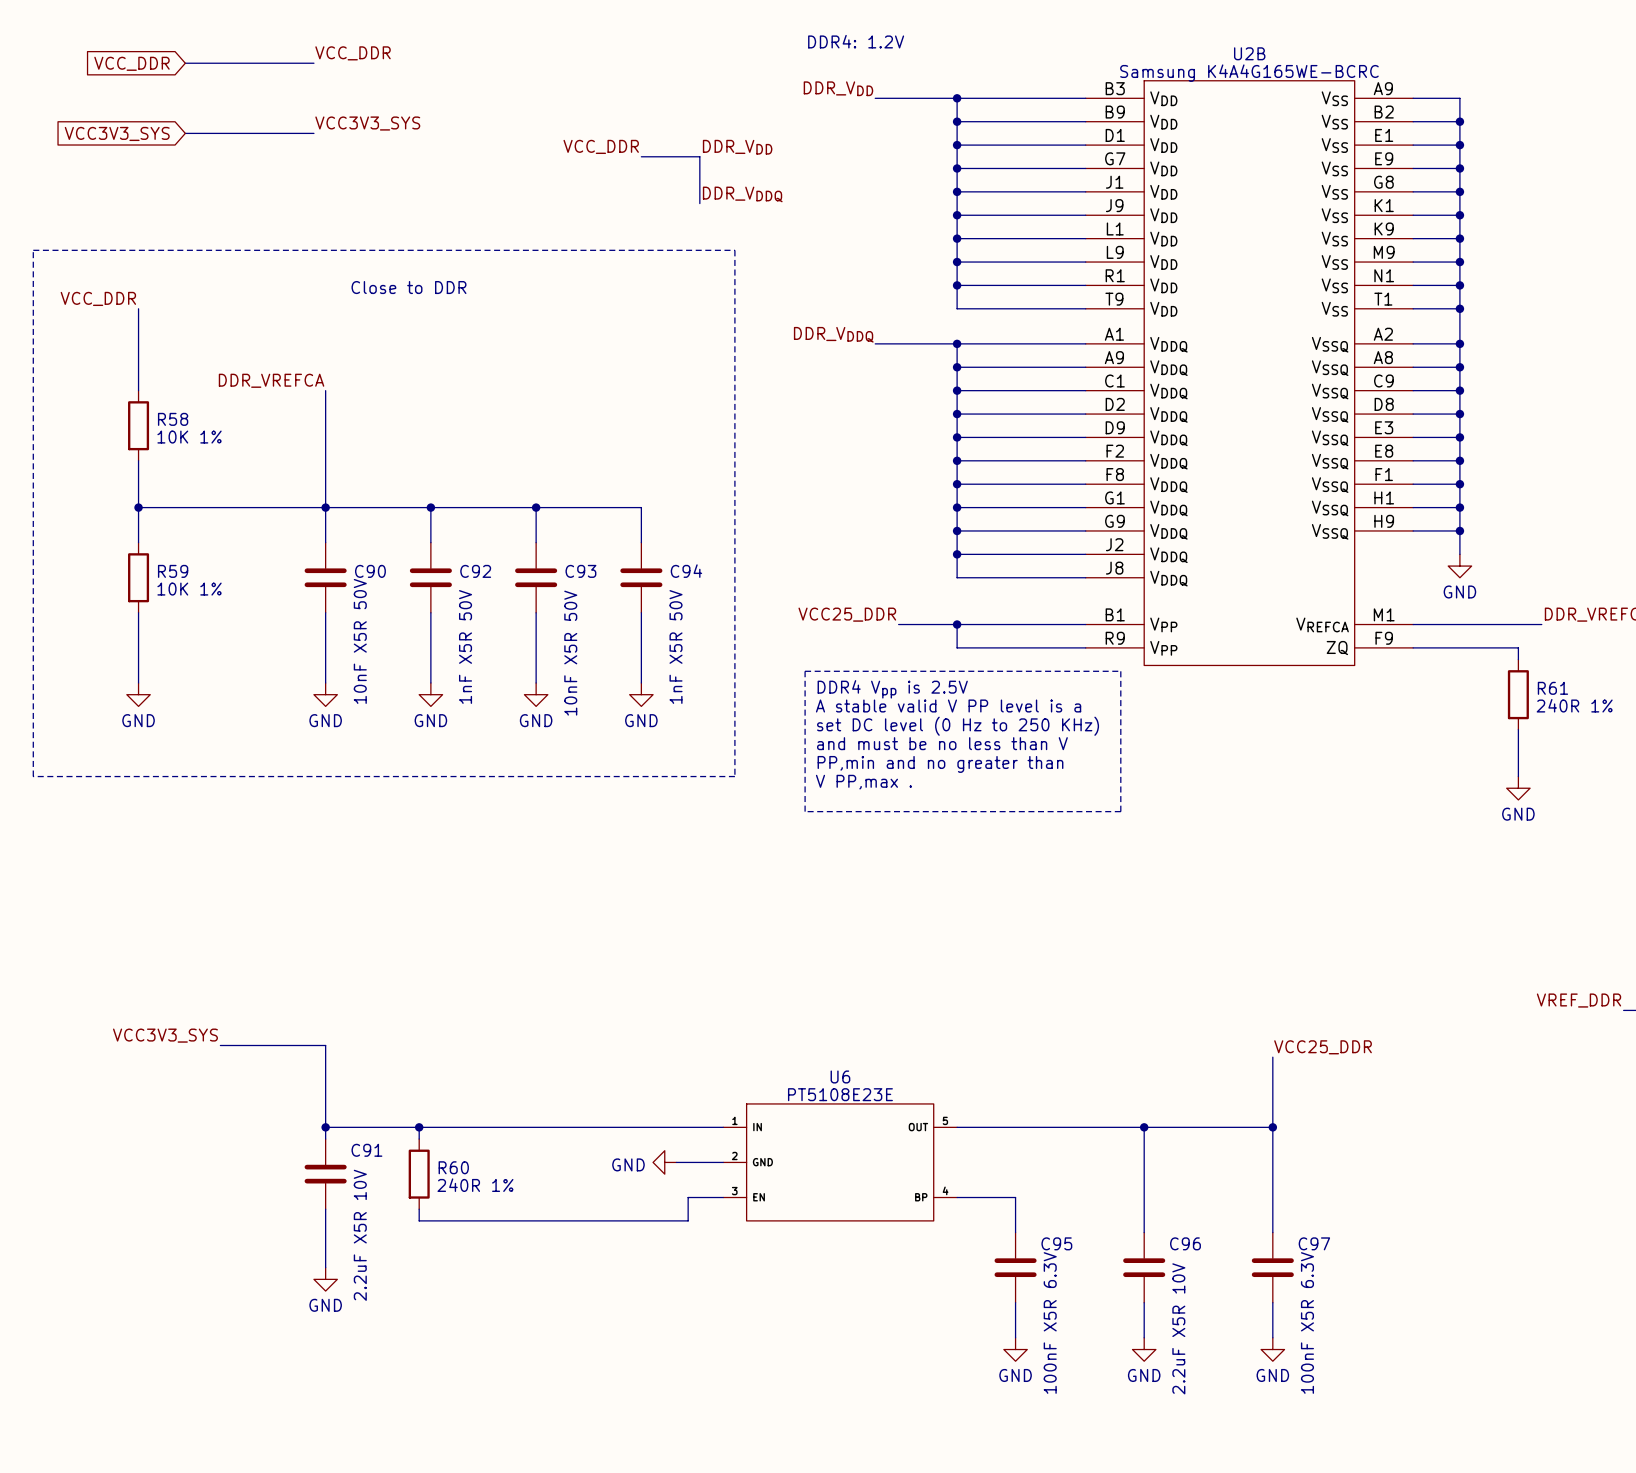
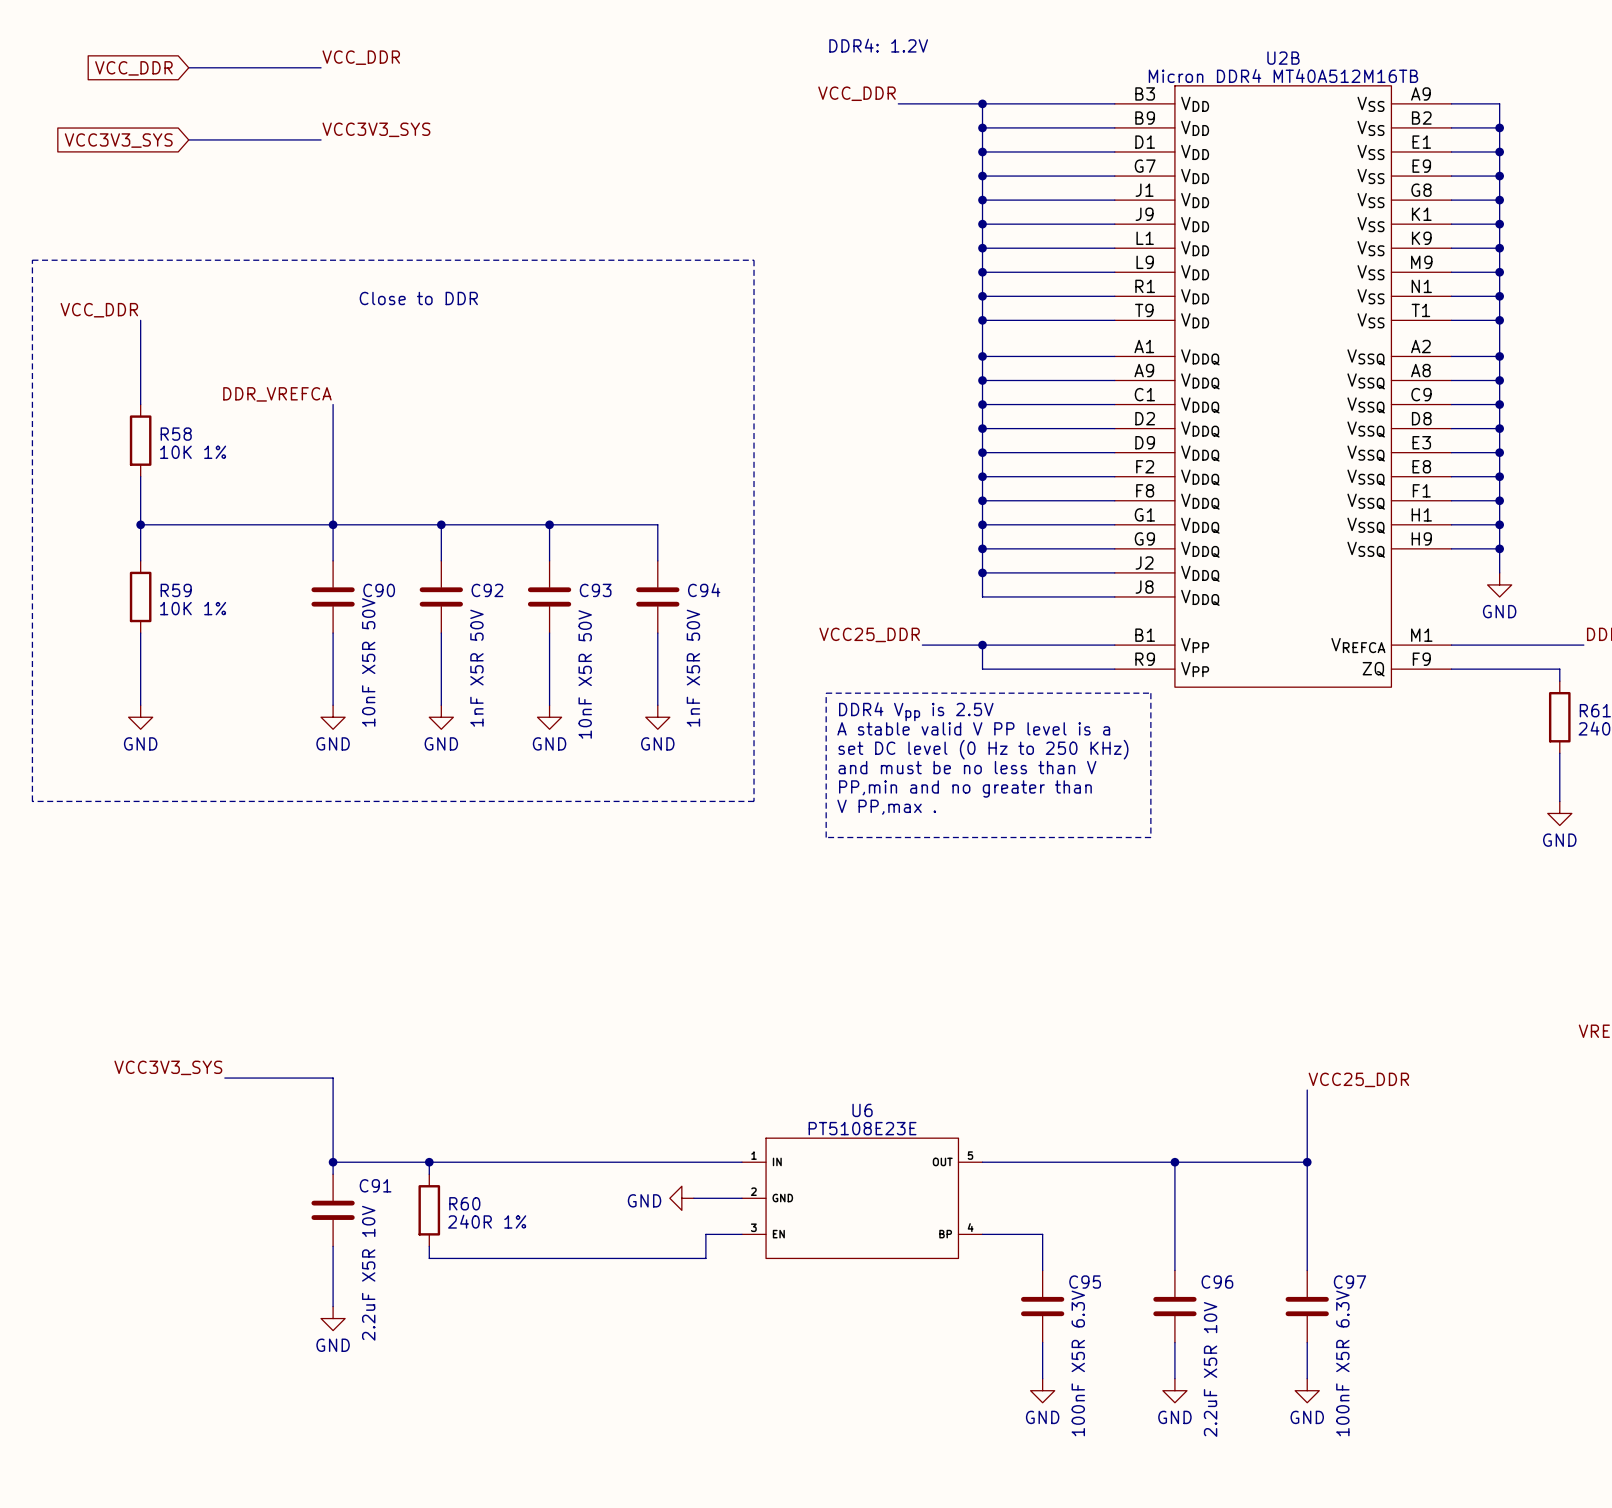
U2B value: Samsung K4A4G165WE-BCRC (1249, 73) -> Micron DDR4 MT40A512M16TB (1283, 76)
label: DDR_VDD (838, 88) -> VCC_DDR (857, 93)
label: VCC_DDR (601, 146) -> none
label: DDR_VDD (737, 147) -> none
wire: (641, 156) (699, 156) (699, 203) -> none
label: DDR_VDDQ (742, 194) -> none
junction: none -> (982, 320)
label: DDR_VDDQ (833, 334) -> none
wire: (875, 343) (957, 343) -> (982, 320) (982, 356)

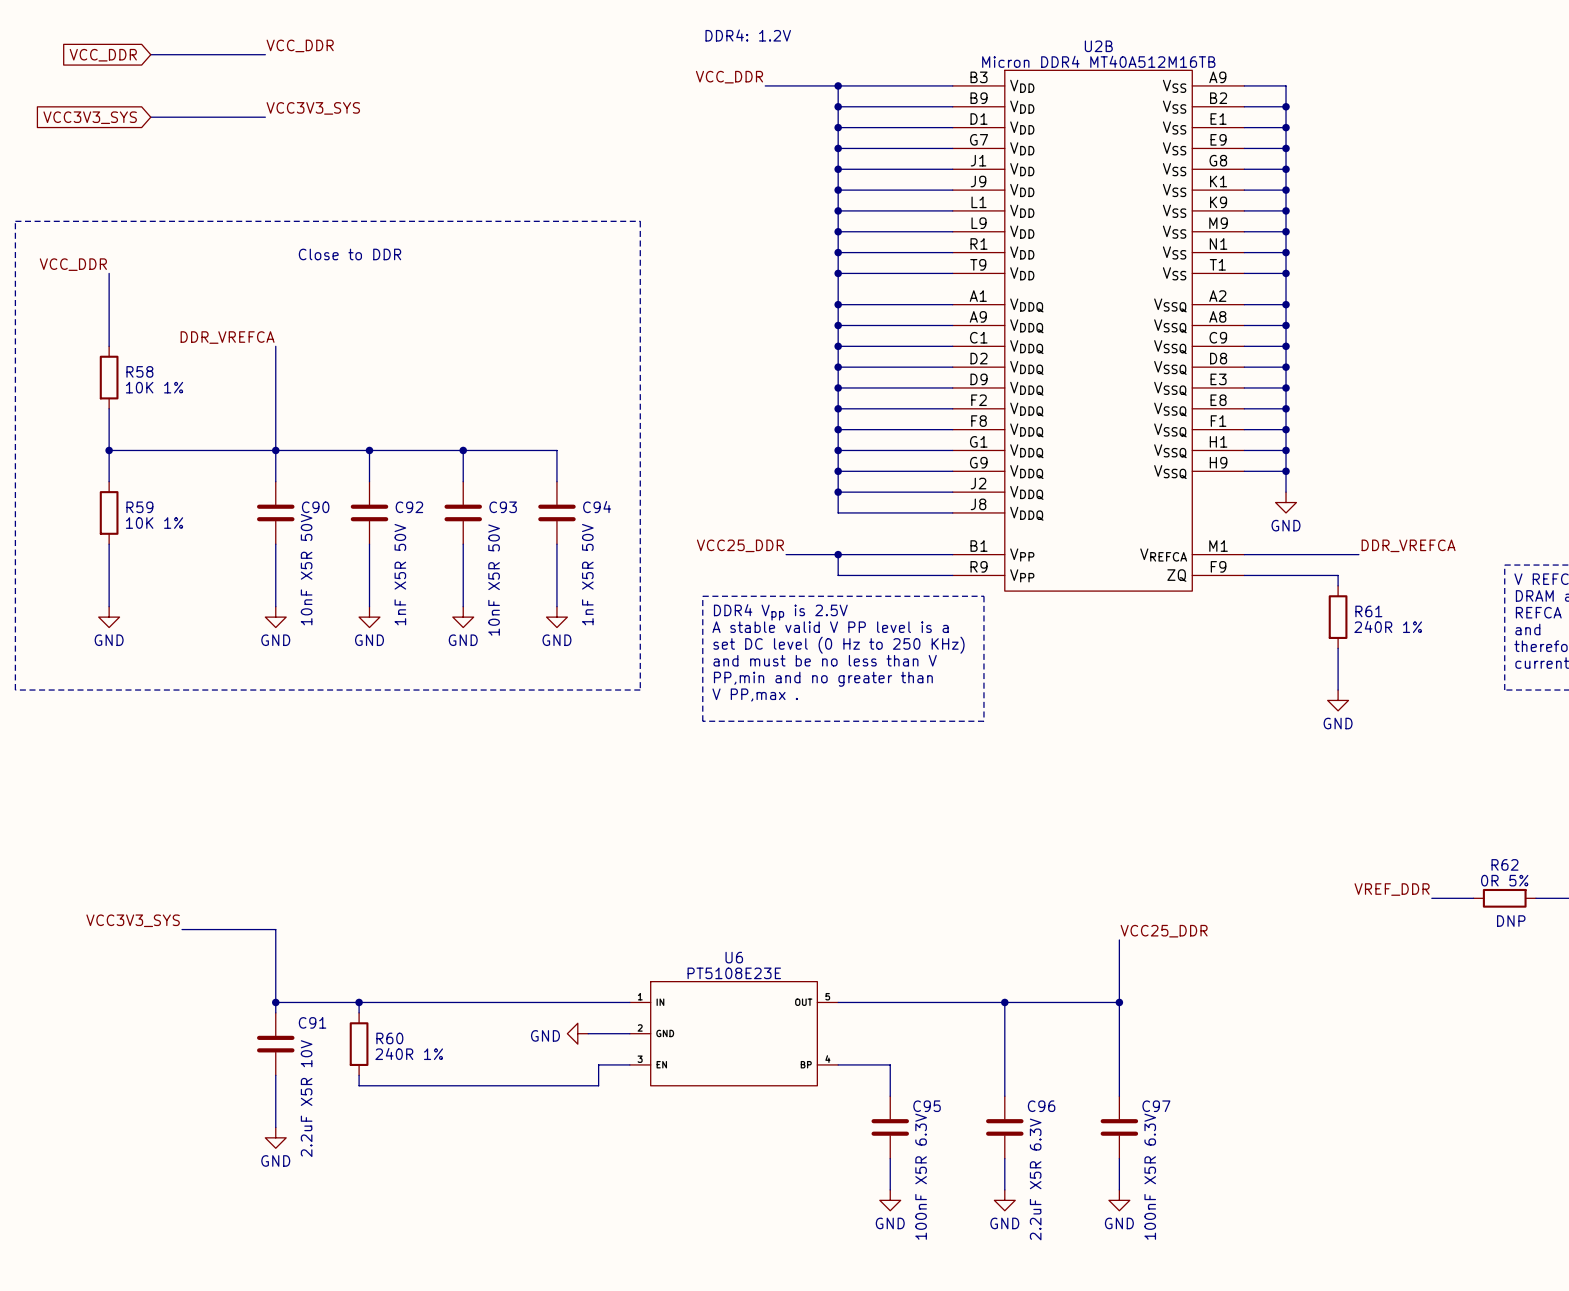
C96 value: 2.2uF X5R 10V (1210, 1369) -> 2.2uF X5R 6.3V (1035, 1179)

